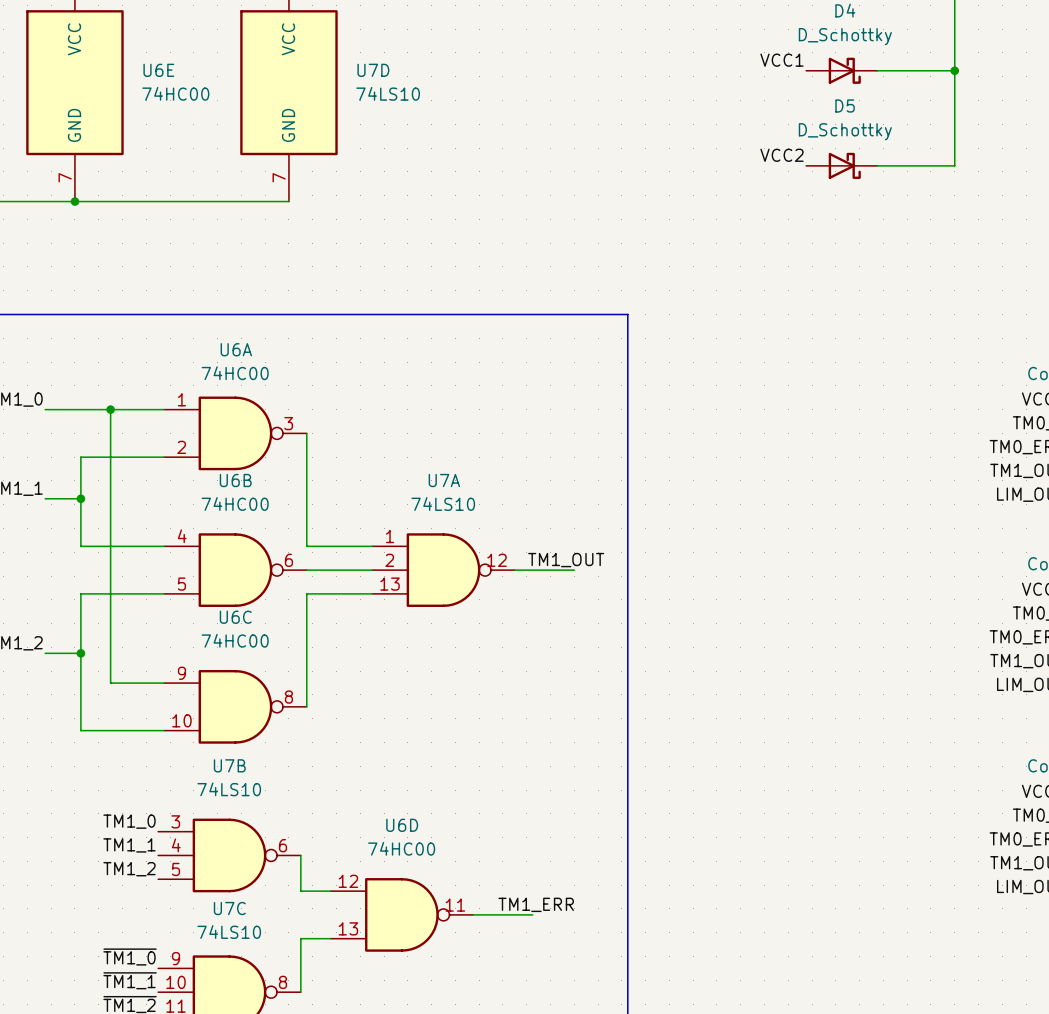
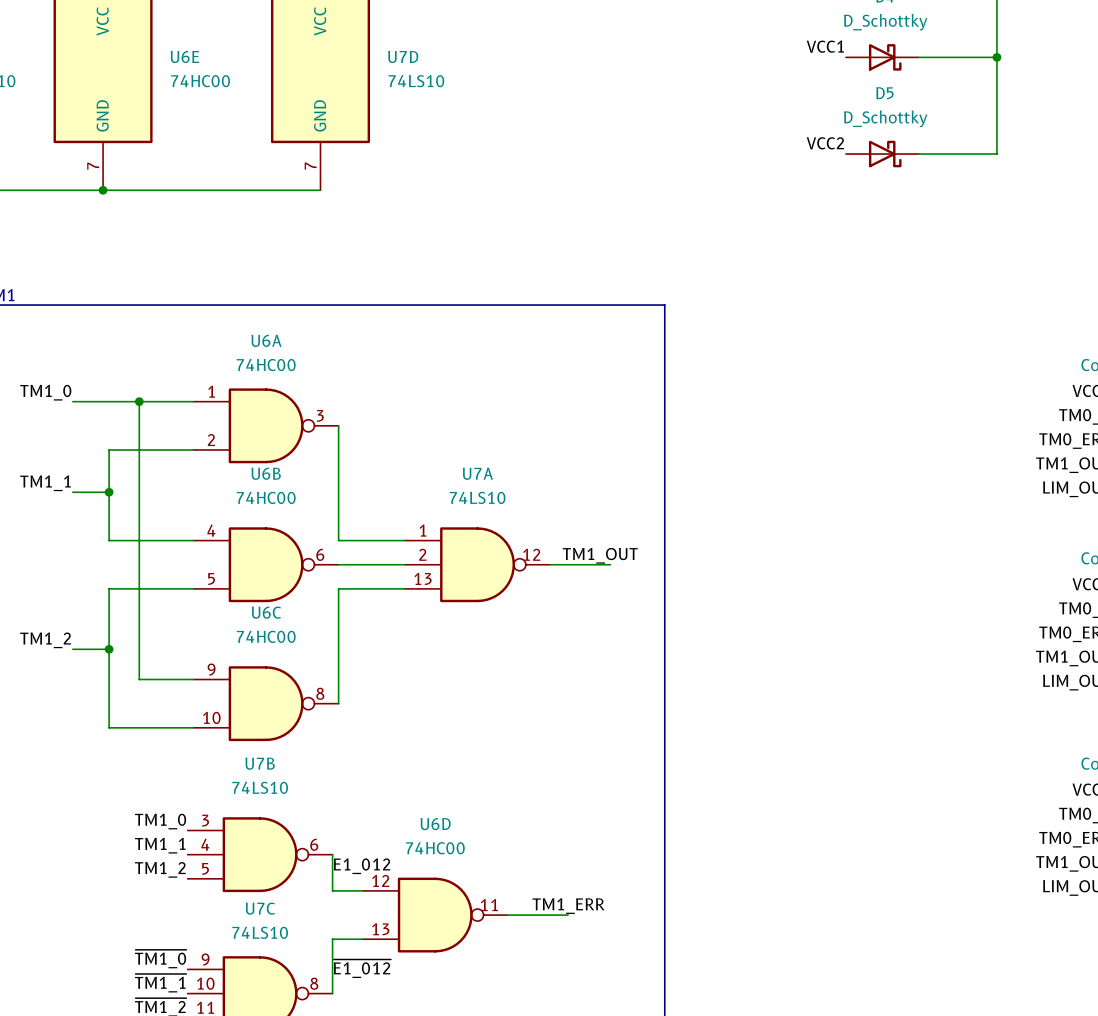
label: none -> E1_012 (362, 866)
label: none -> ~{E1_012} (362, 968)

